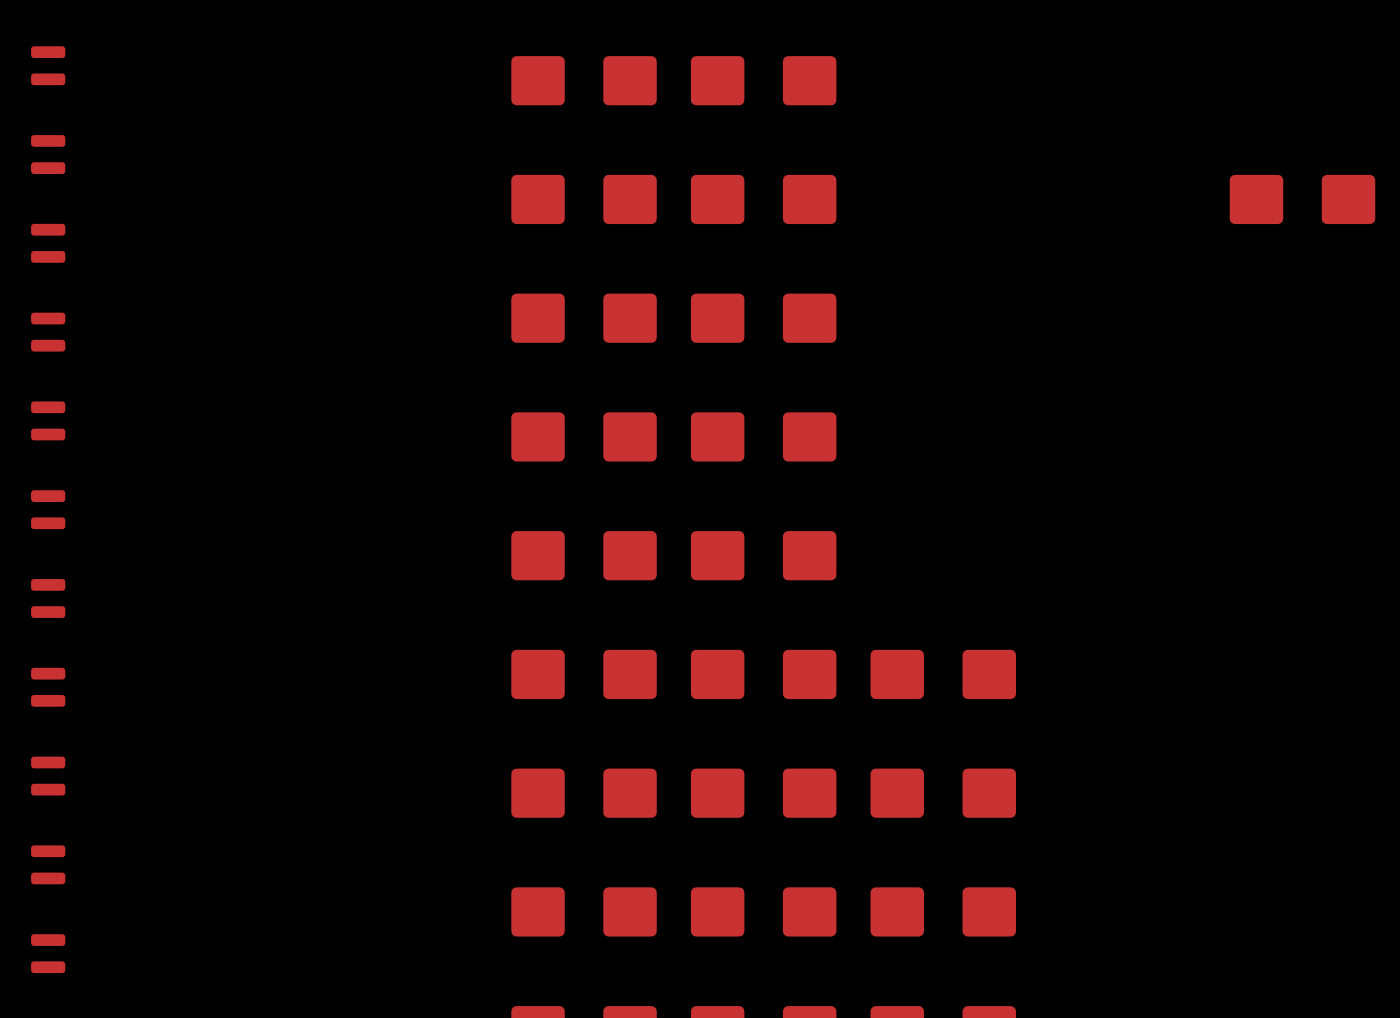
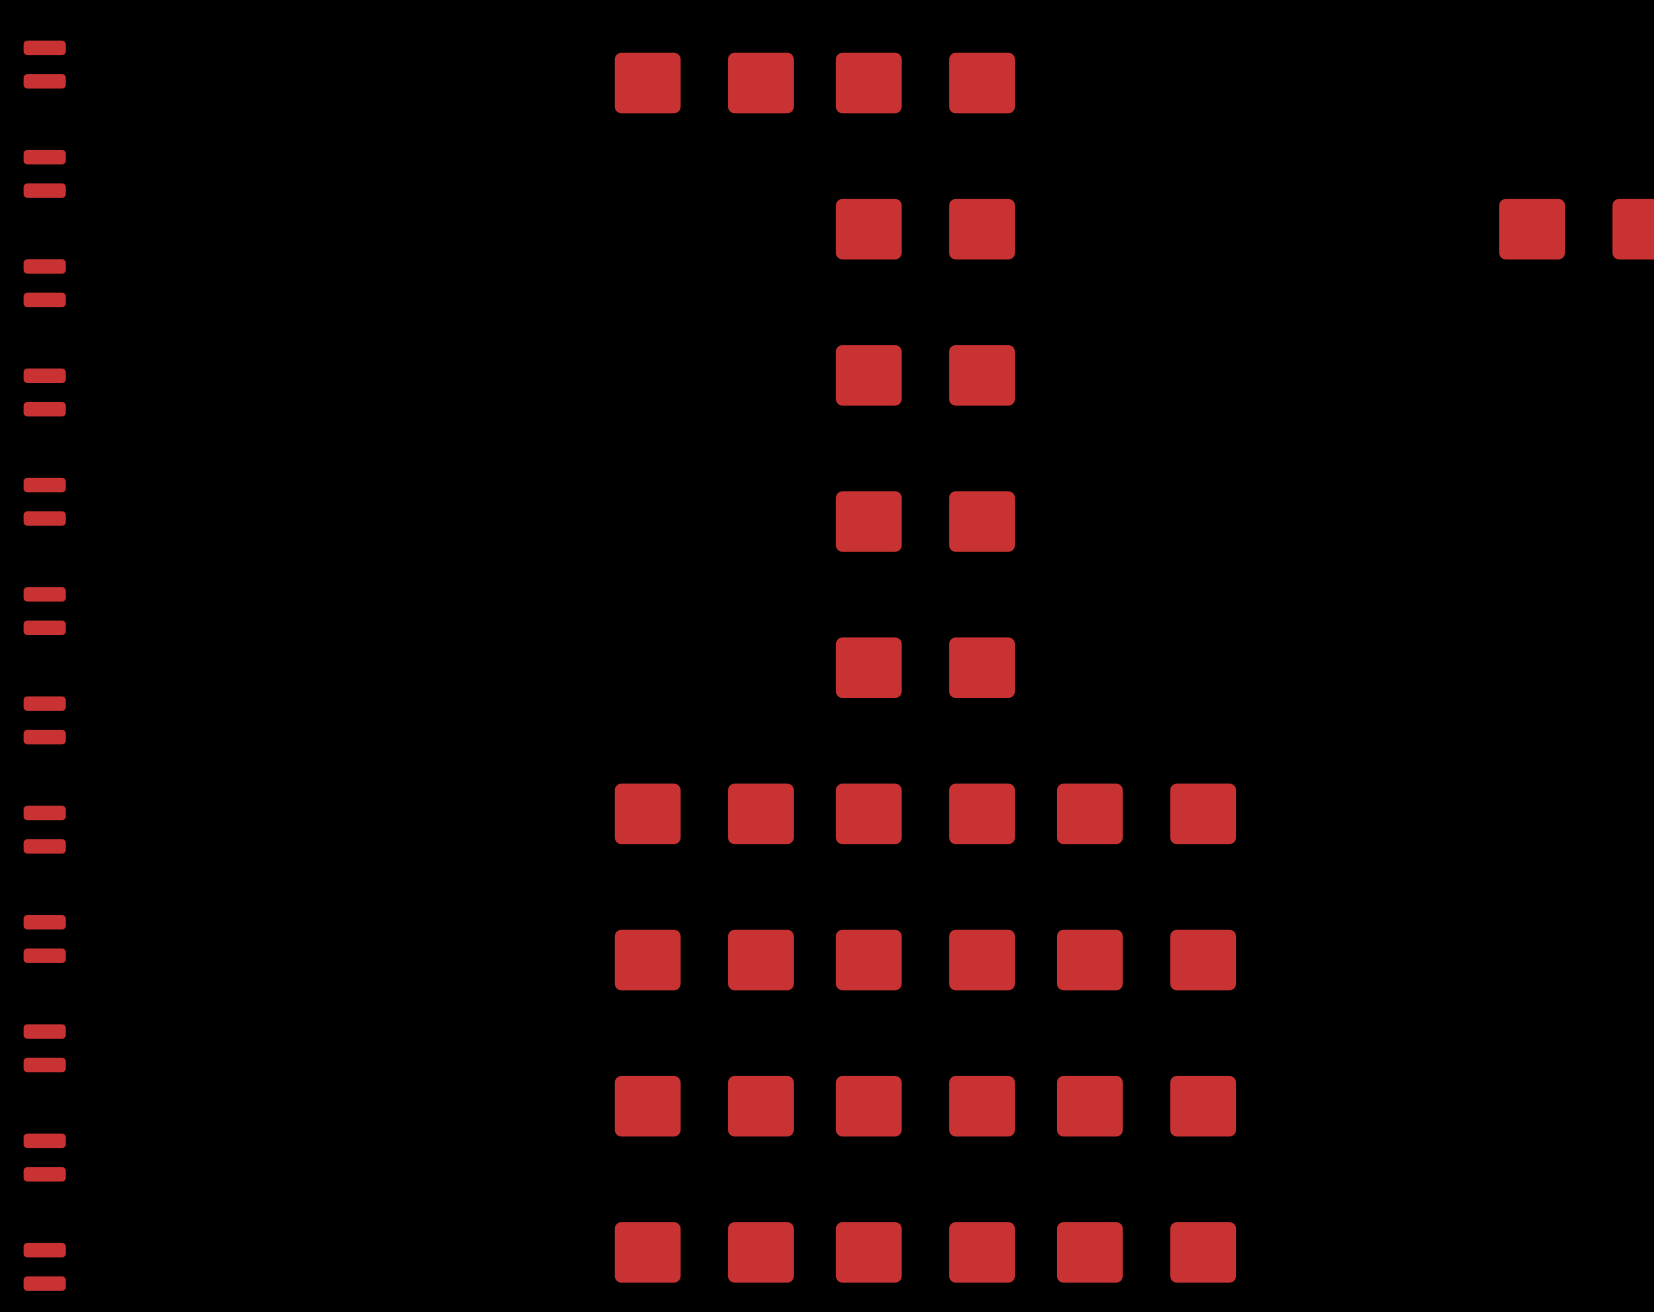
part: (584, 199) -> none
part: (584, 318) -> none
part: (584, 436) -> none
part: (584, 555) -> none

